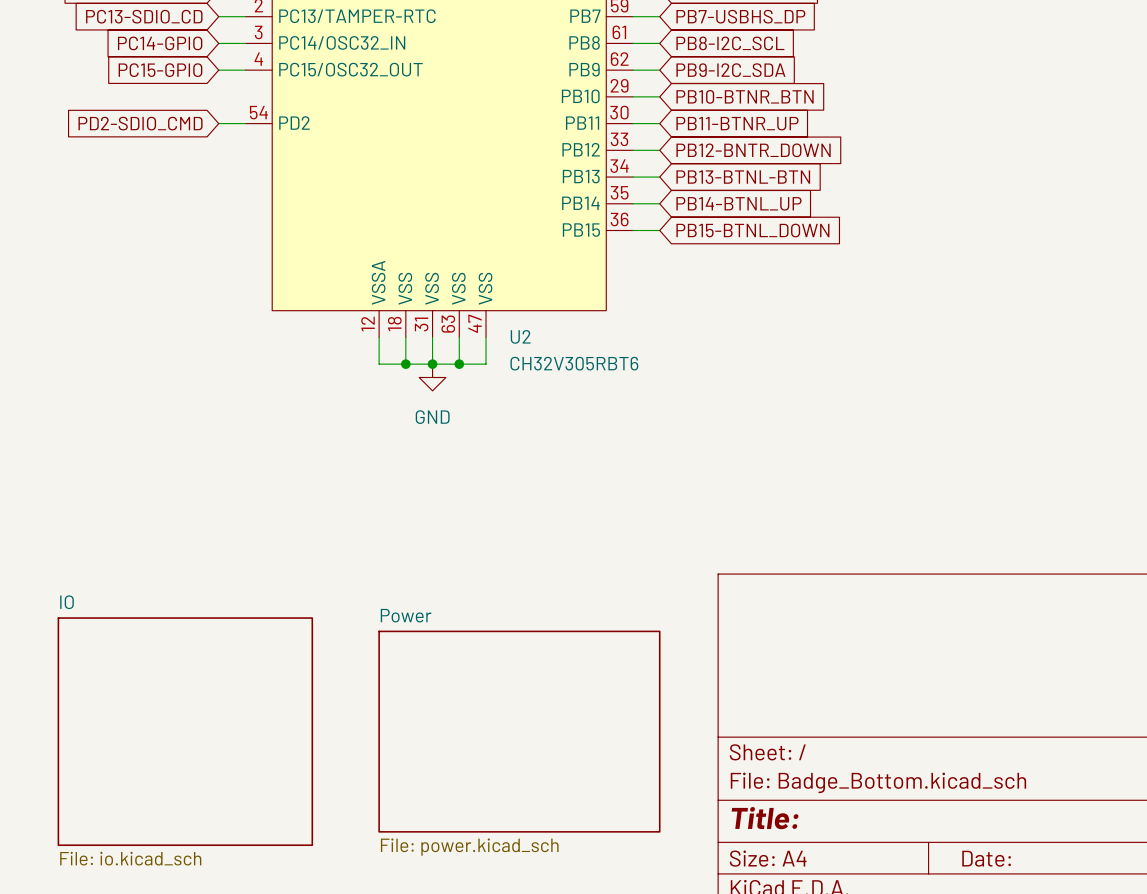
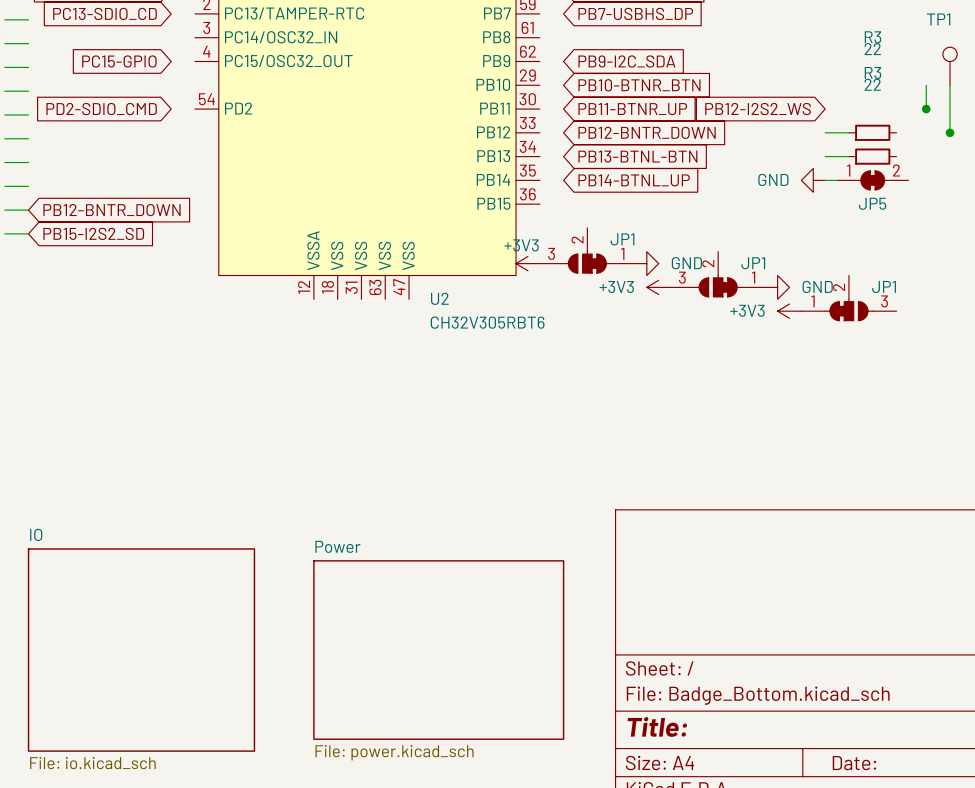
wire: (218, 16) (245, 16) -> (4, 19) (28, 19)
wire: (633, 16) (659, 16) -> none
global label: PC14-GPIO (160, 43) -> none
wire: (218, 43) (245, 43) -> (4, 43) (28, 43)
wire: (633, 43) (659, 43) -> none
global label: PB8-I2C_SCL (730, 43) -> none
wire: (218, 70) (245, 70) -> (4, 67) (28, 67)
wire: (633, 70) (659, 70) -> none
TP1: none -> (950, 66)
wire: (633, 96) (659, 96) -> none
wire: none -> (926, 85) (926, 109)
wire: none -> (950, 85) (950, 132)
wire: none -> (4, 91) (28, 91)
wire: (218, 123) (245, 123) -> (4, 114) (28, 114)
wire: (633, 123) (659, 123) -> none
global label: none -> PB12-I2S2_WS (758, 109)
junction: none -> (926, 109)
wire: (633, 150) (659, 150) -> none
wire: none -> (825, 132) (848, 132)
R3: none -> 22 (872, 132)
junction: none -> (950, 132)
wire: none -> (4, 138) (28, 138)
wire: (633, 177) (659, 177) -> none
wire: none -> (825, 156) (848, 156)
R3: none -> 22 (872, 156)
wire: none -> (4, 162) (28, 162)
wire: (633, 203) (659, 203) -> none
power symbol: none -> GND (813, 180)
wire: none -> (825, 180) (837, 180)
JP5: none -> (872, 180)
wire: none -> (4, 186) (28, 186)
wire: (633, 230) (659, 230) -> none
global label: PB15-BTNL_DOWN (752, 230) -> none
wire: none -> (4, 210) (28, 210)
global label: none -> PB12-BNTR_DOWN (112, 210)
wire: none -> (4, 233) (28, 233)
global label: none -> PB15-I2S2_SD (93, 233)
JP1: none -> (587, 250)
power symbol: none -> +3V3 (527, 263)
power symbol: none -> GND (646, 263)
JP1: none -> (718, 274)
power symbol: none -> +3V3 (658, 287)
power symbol: none -> GND (777, 287)
JP1: none -> (848, 298)
wire: (379, 337) (379, 364) (486, 364) (486, 337) -> none
wire: (405, 337) (405, 364) -> none
wire: (432, 337) (432, 364) -> none
wire: (459, 337) (459, 364) -> none
power symbol: none -> +3V3 (789, 311)
junction: (405, 364) -> none
junction: (432, 364) -> none
junction: (459, 364) -> none
power symbol: GND (432, 377) -> none

